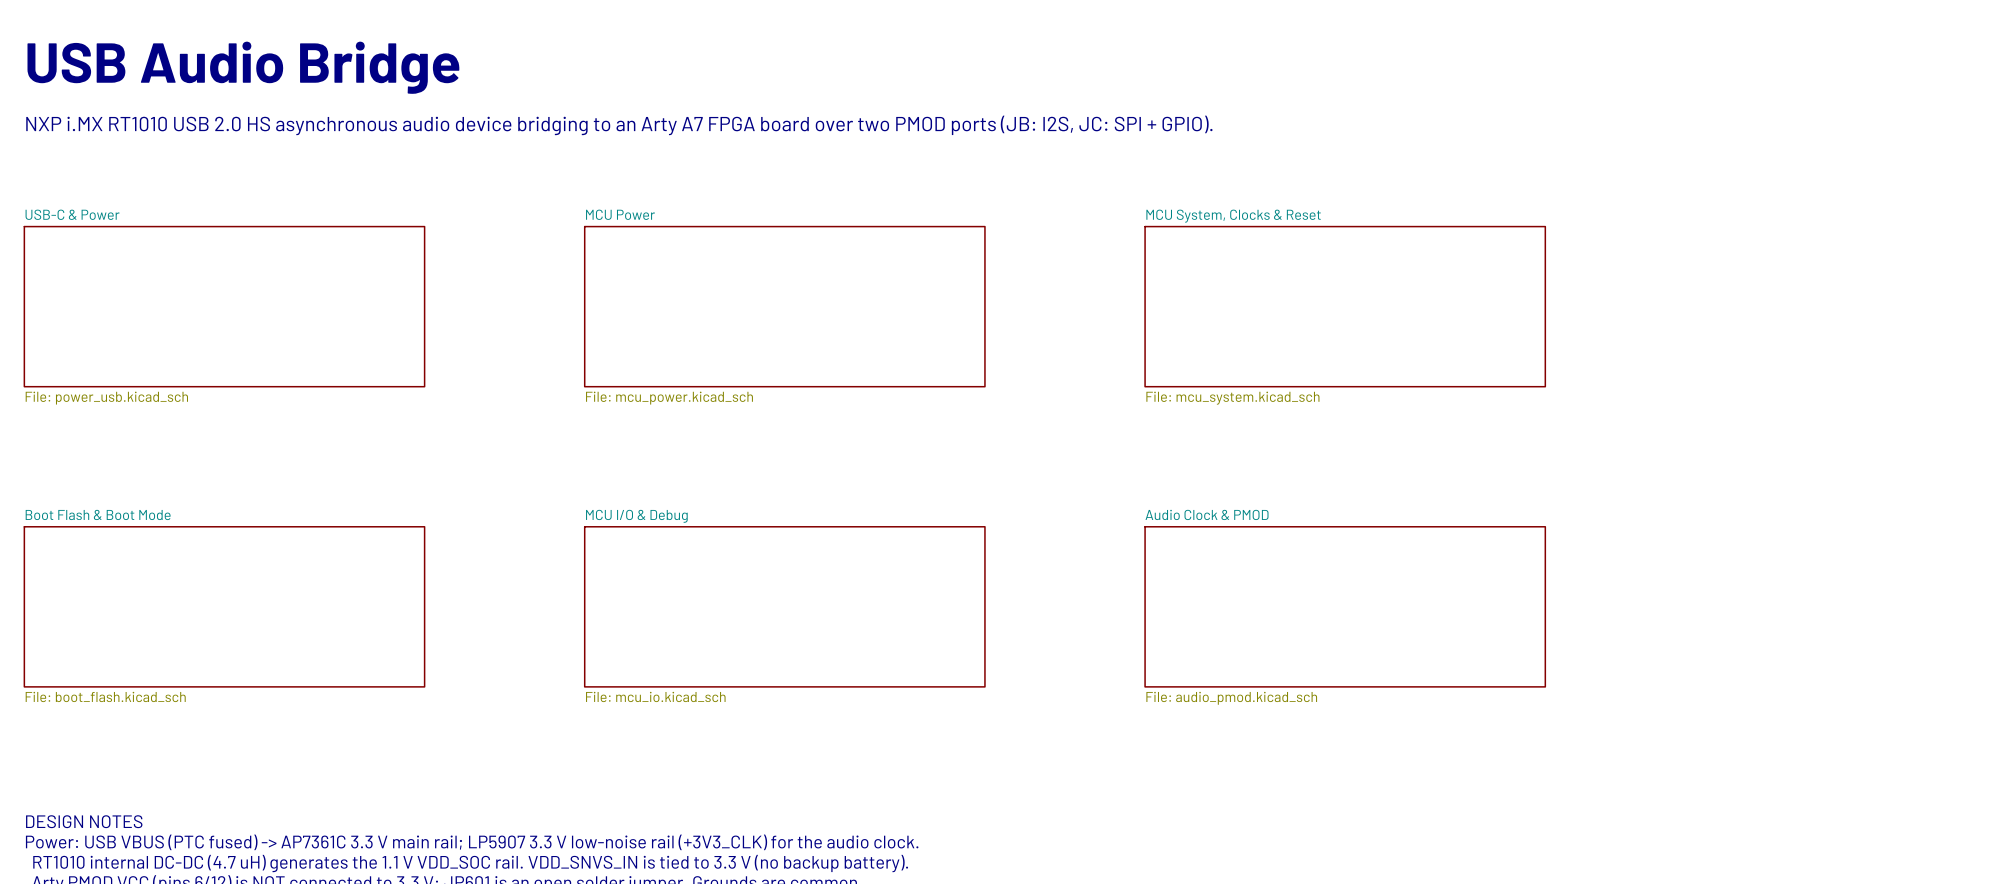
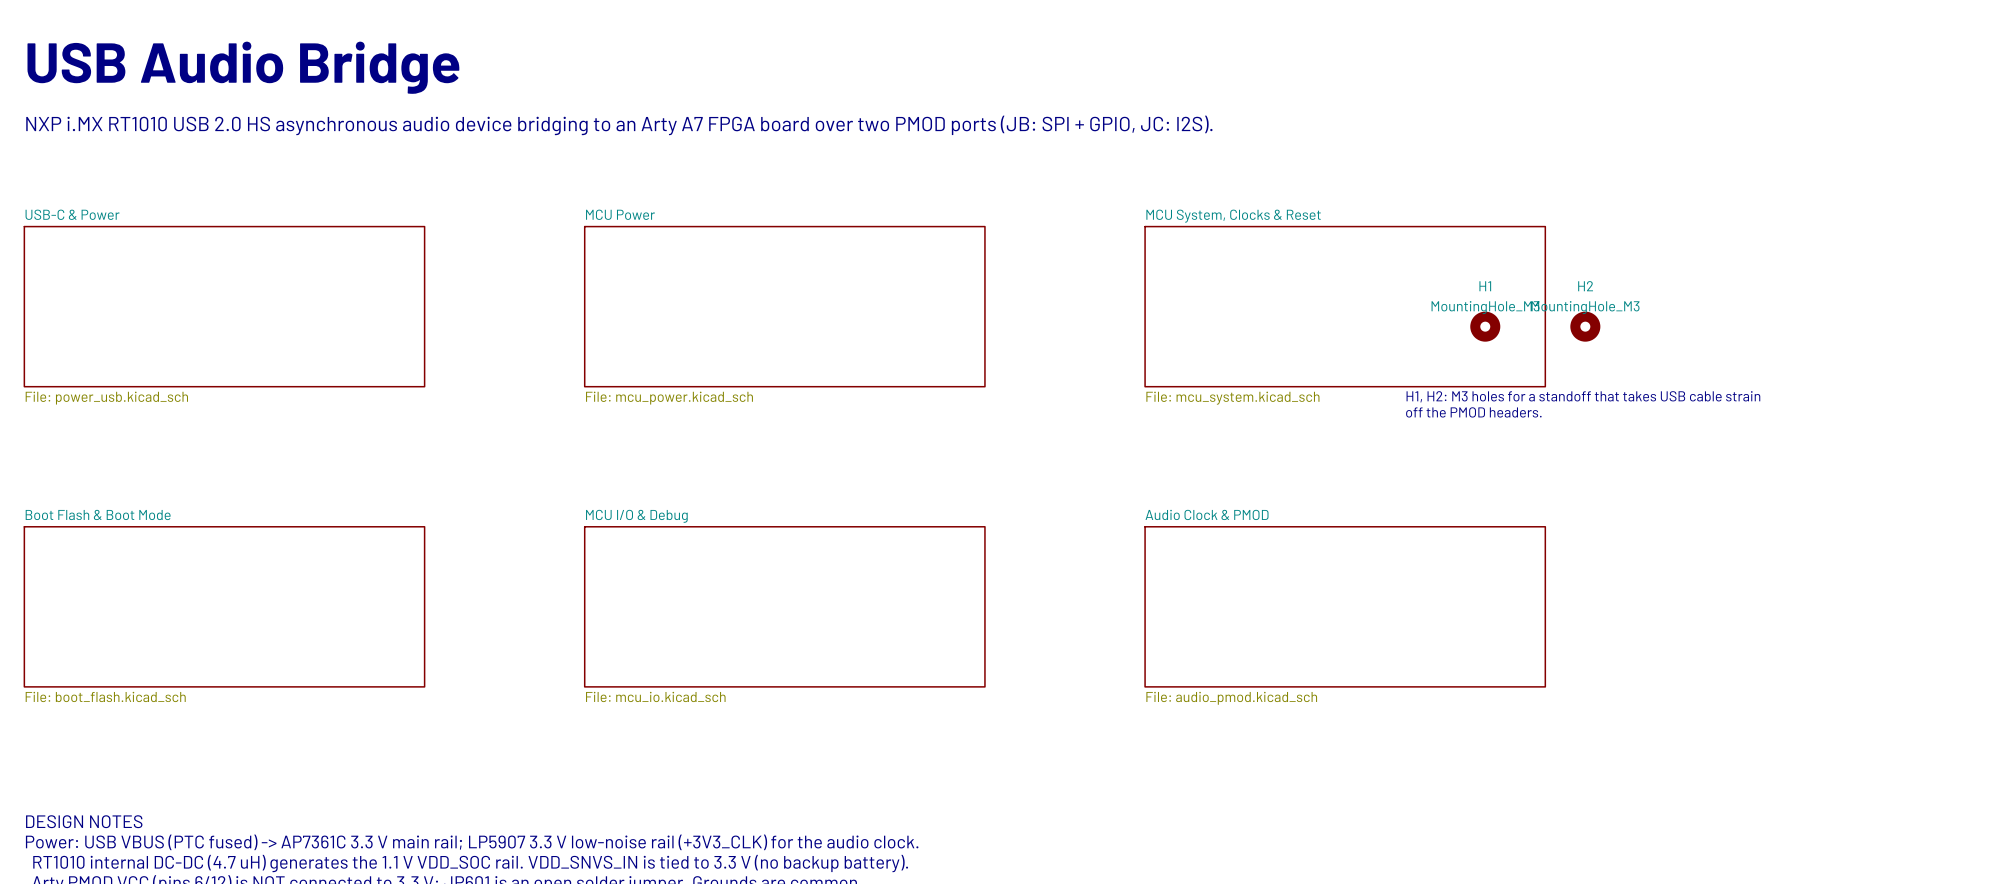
text: NXP i.MX RT1010 USB 2.0 HS asynchronous audio device bridging to an Arty A7 FPGA board over two PMOD ports (JB: I2S, JC: SPI + GPIO). (619, 125) -> NXP i.MX RT1010 USB 2.0 HS asynchronous audio device bridging to an Arty A7 FPGA board over two PMOD ports (JB: SPI + GPIO, JC: I2S). (619, 125)
H1: none -> MountingHole_M3 (1485, 326)
H2: none -> MountingHole_M3 (1585, 326)
text: none -> H1, H2: M3 holes for a standoff that takes USB cable strain (1583, 396)
text: none -> off the PMOD headers. (1473, 412)

